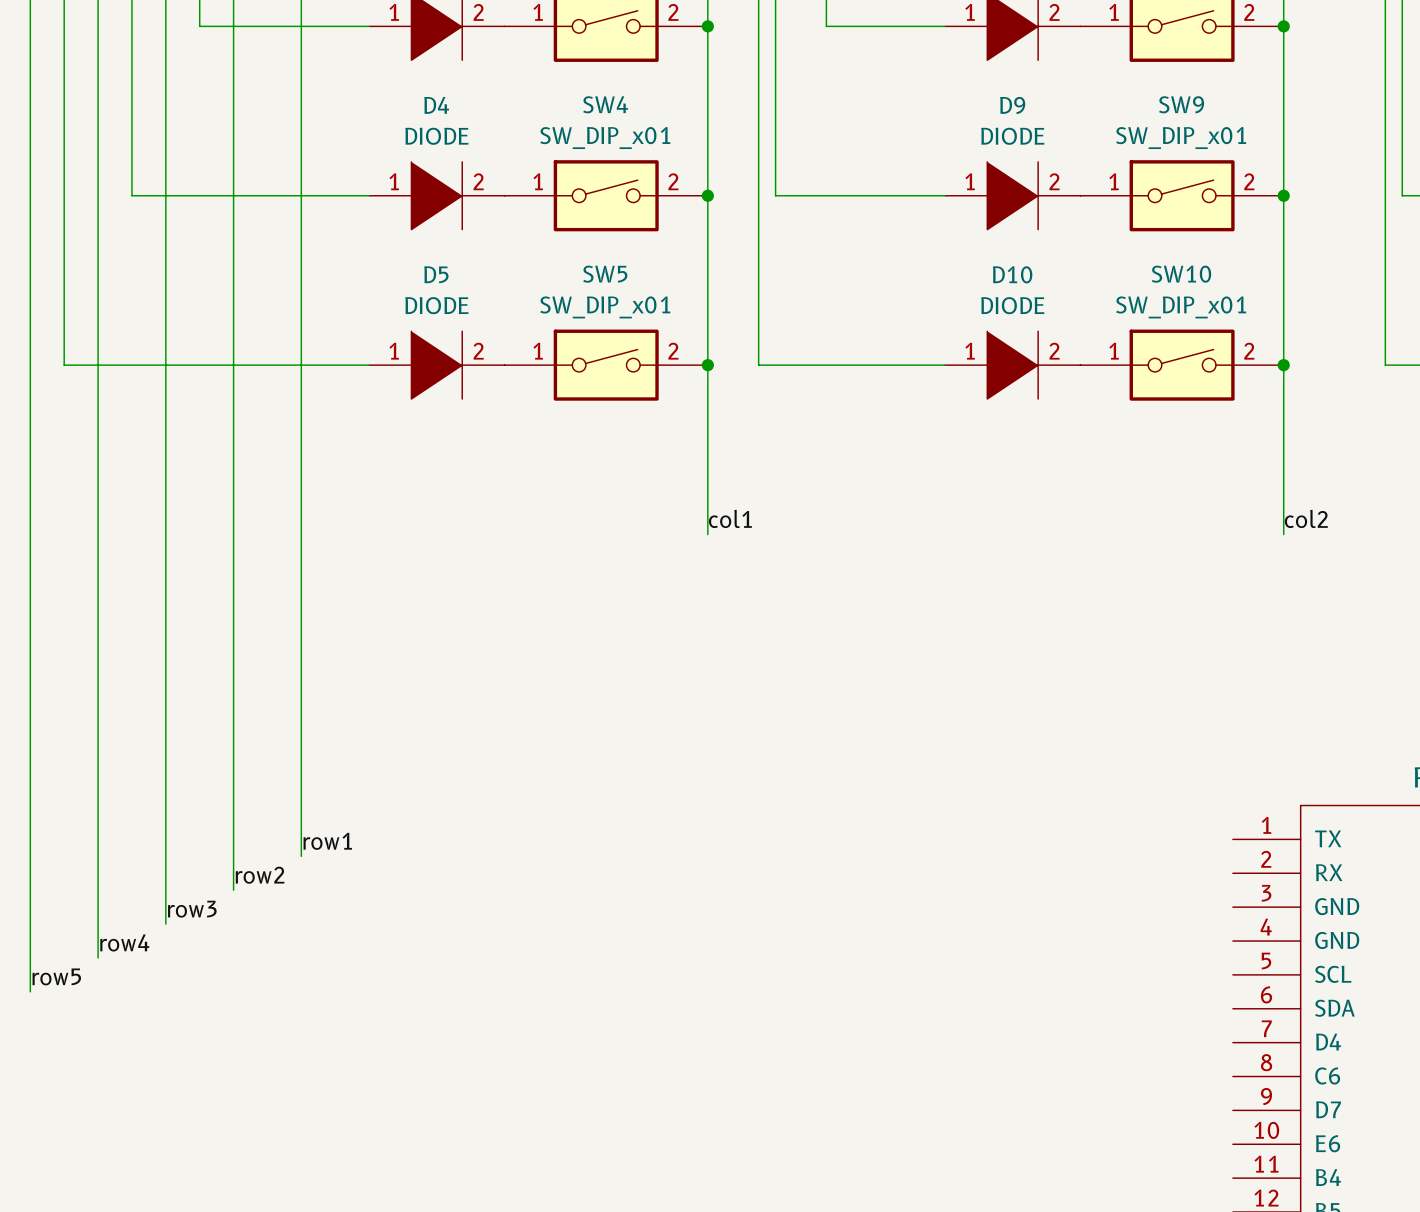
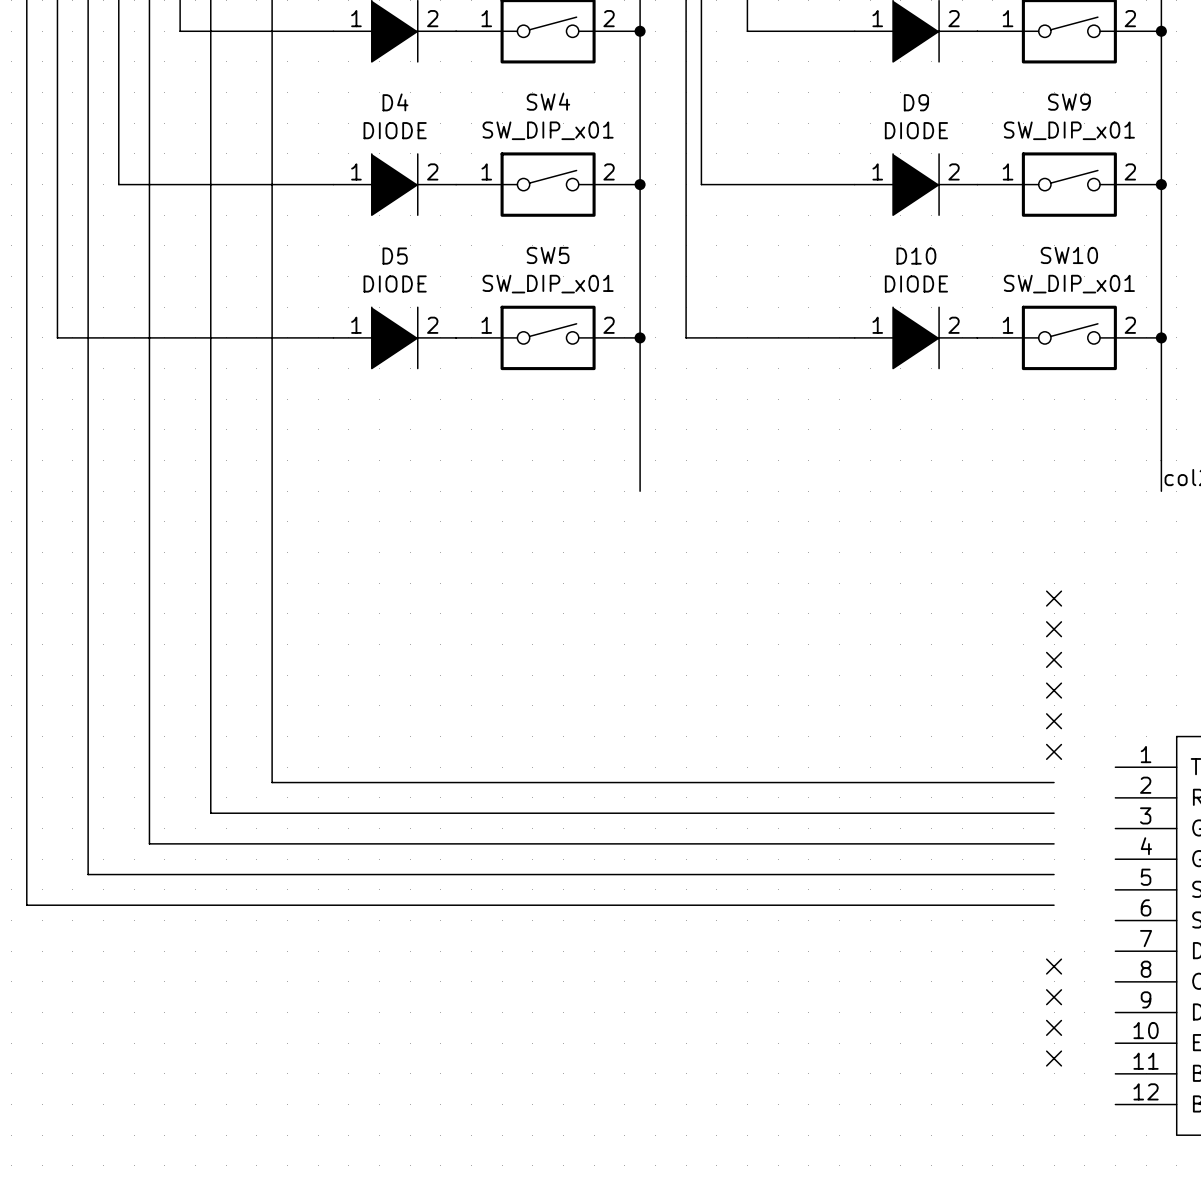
label: col1 (730, 518) -> none
no-connect mark: none -> (1054, 598)
no-connect mark: none -> (1054, 629)
no-connect mark: none -> (1054, 659)
no-connect mark: none -> (1054, 690)
no-connect mark: none -> (1054, 721)
no-connect mark: none -> (1054, 751)
label: row1 (327, 841) -> none
wire: none -> (272, 782) (1054, 782)
label: row2 (260, 875) -> none
wire: none -> (210, 813) (1054, 813)
label: row3 (192, 909) -> none
wire: none -> (149, 843) (1054, 843)
label: row4 (124, 942) -> none
wire: none -> (88, 874) (1054, 874)
label: row5 (56, 976) -> none
wire: none -> (26, 905) (1054, 905)
no-connect mark: none -> (1054, 966)
no-connect mark: none -> (1054, 997)
no-connect mark: none -> (1054, 1027)
no-connect mark: none -> (1054, 1058)

